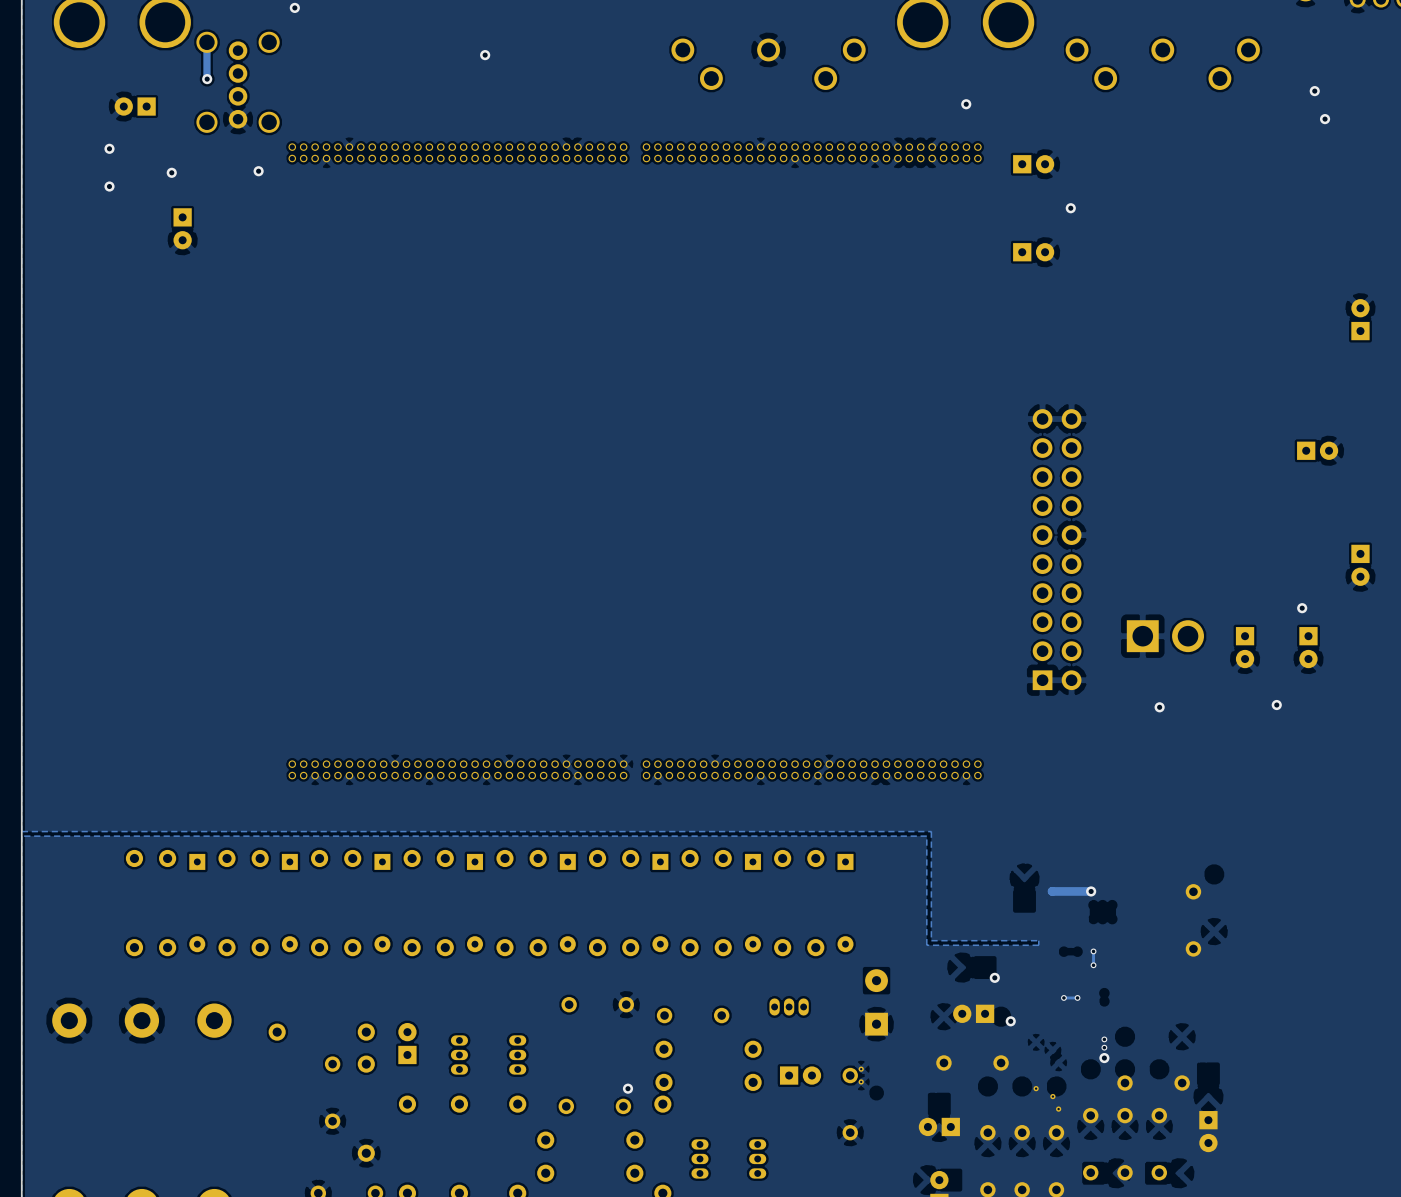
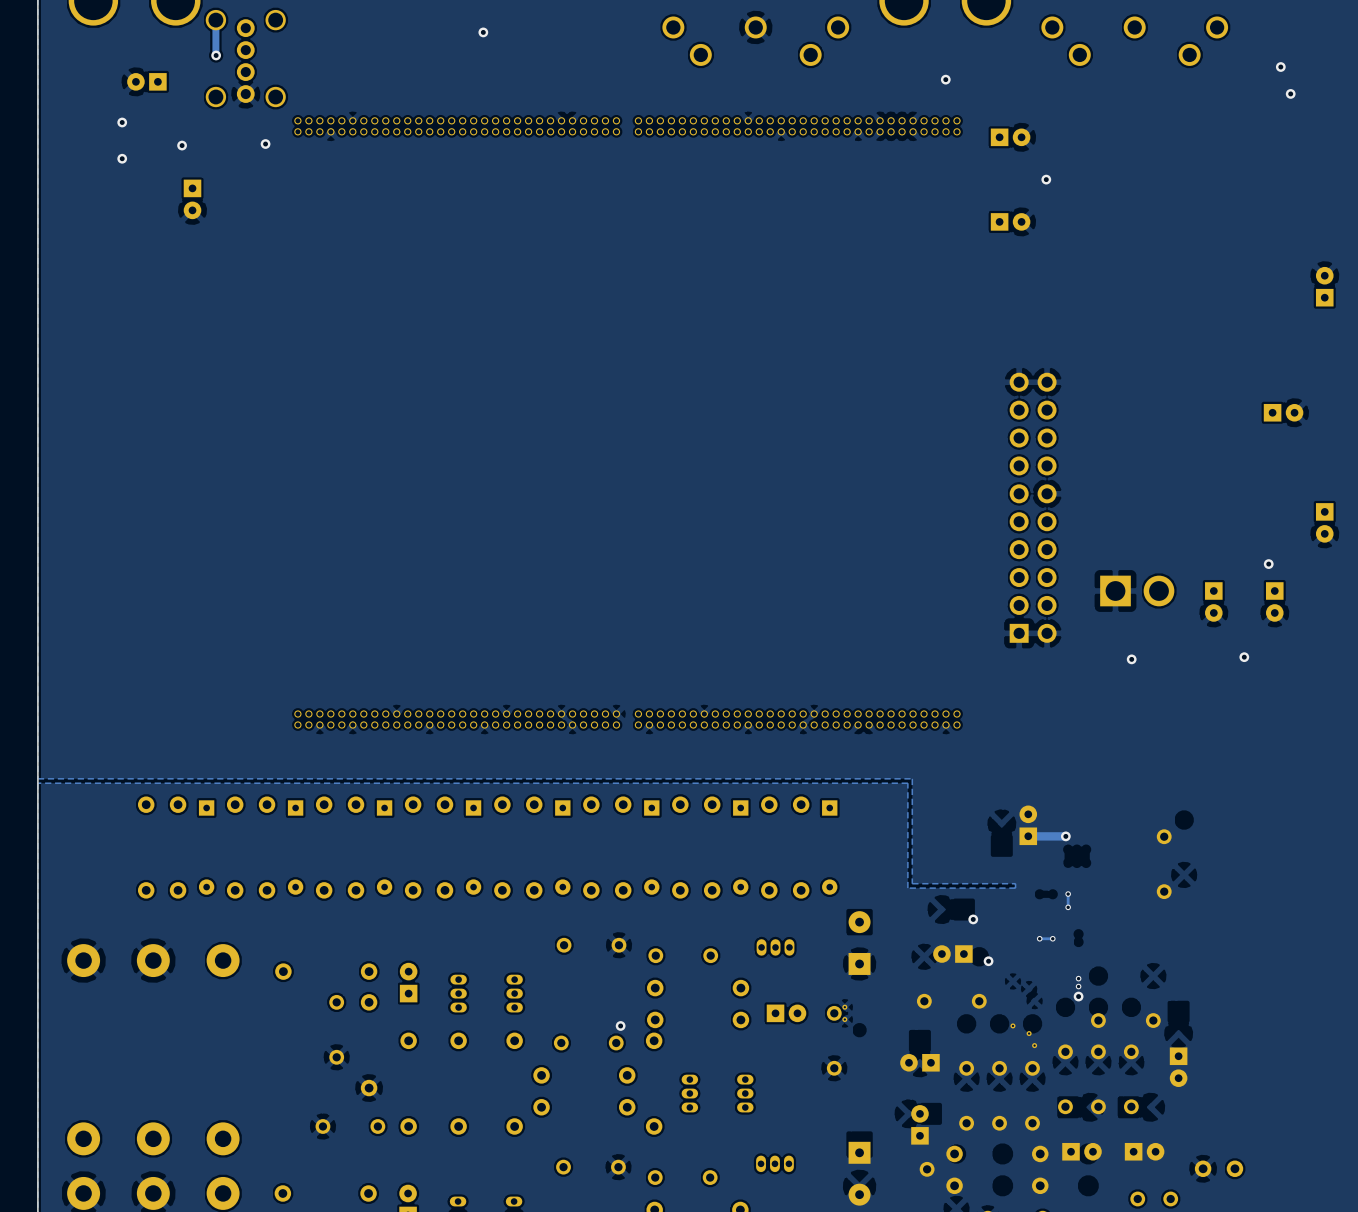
part: none -> (1028, 825)

